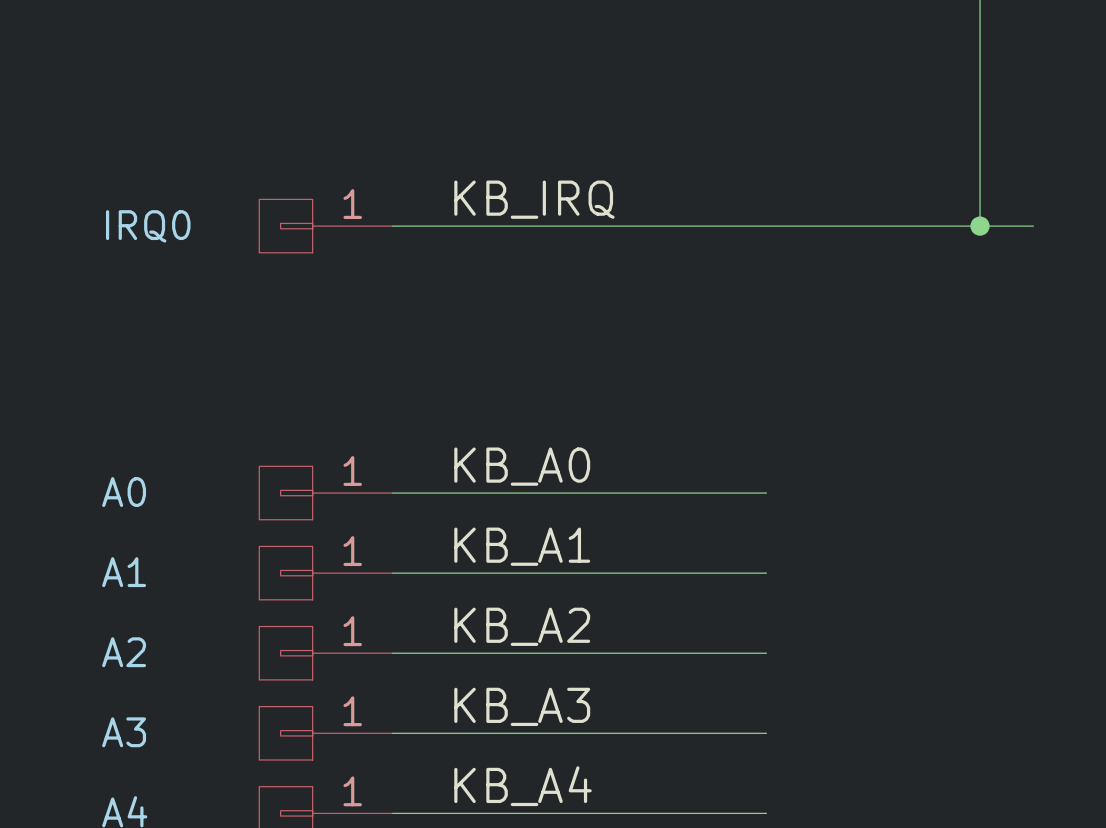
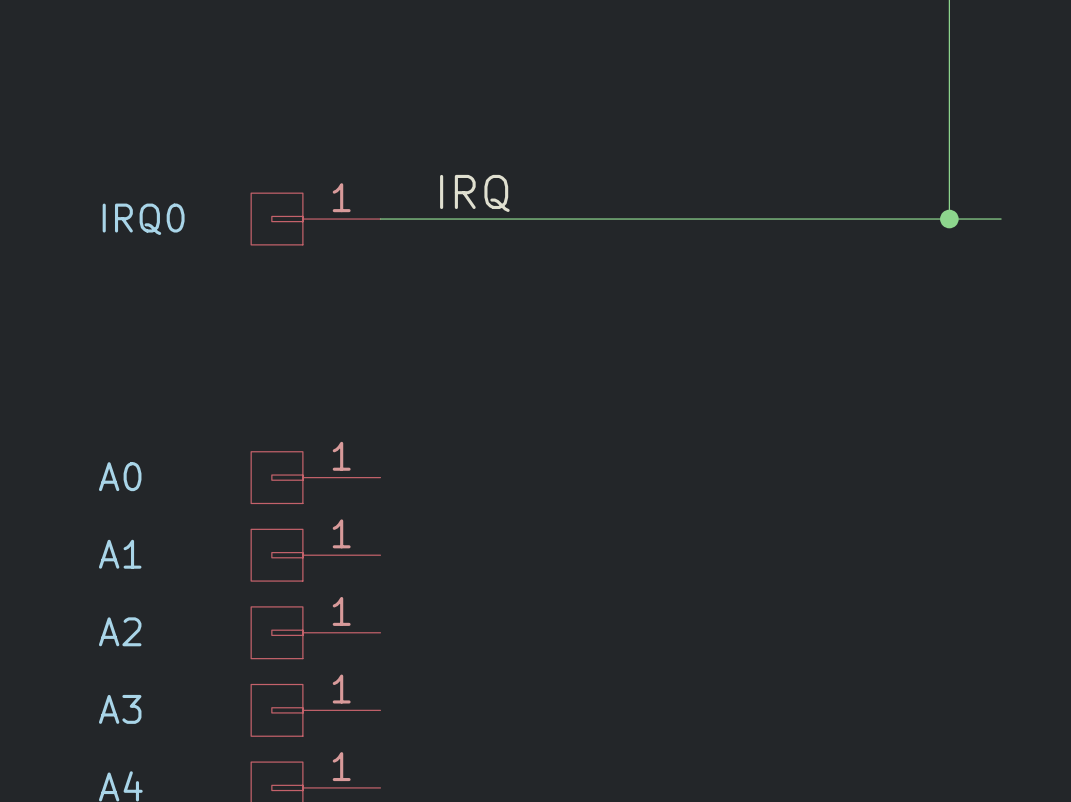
label: KB_IRQ (534, 199) -> IRQ (474, 193)
label: KB_A0 (522, 466) -> none
wire: (392, 493) (766, 493) -> none
label: KB_A1 (522, 546) -> none
wire: (392, 573) (766, 573) -> none
label: KB_A2 (522, 626) -> none
wire: (392, 653) (766, 653) -> none
label: KB_A3 (522, 706) -> none
wire: (392, 733) (766, 733) -> none
label: KB_A4 (522, 786) -> none
wire: (392, 813) (766, 813) -> none

